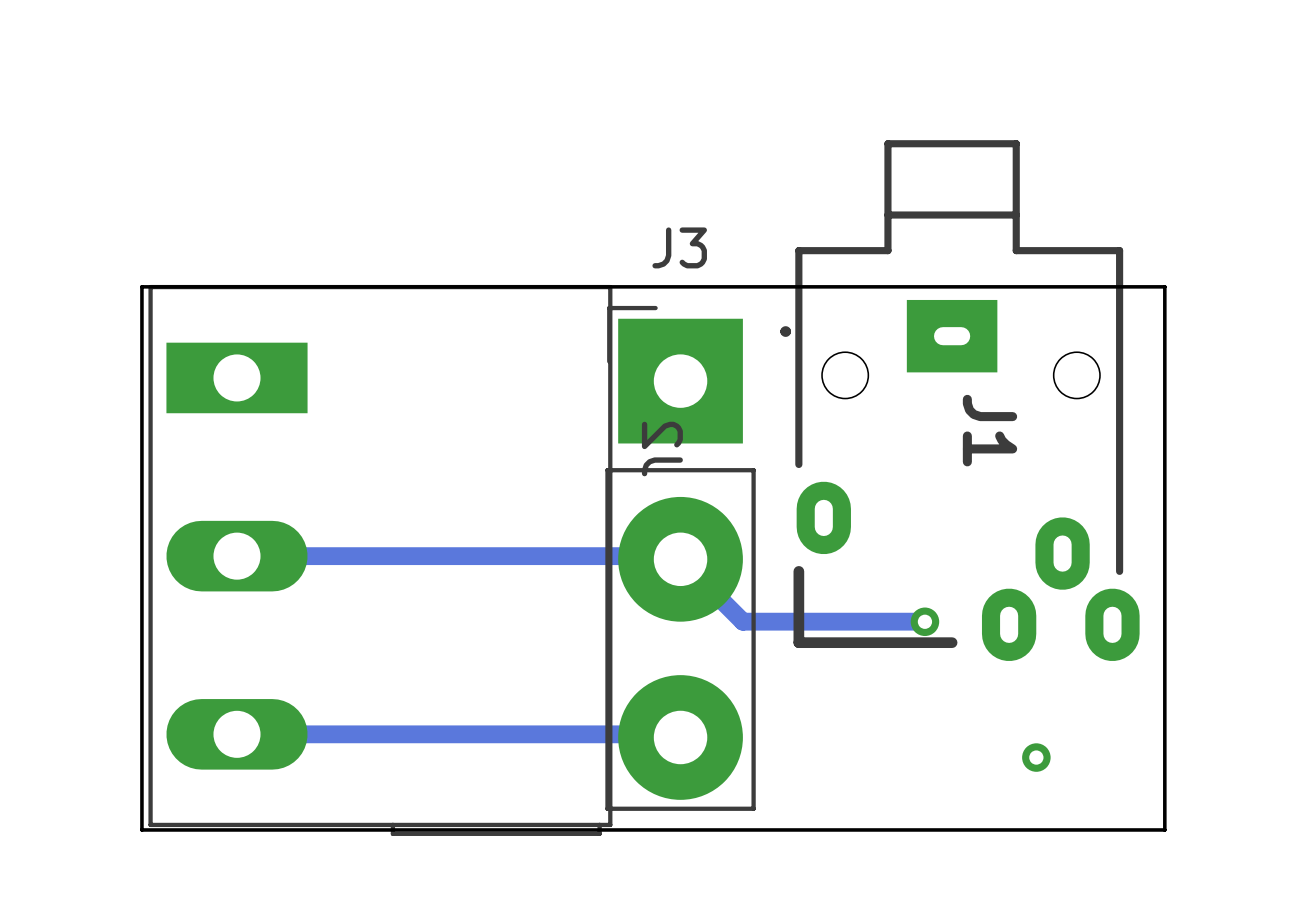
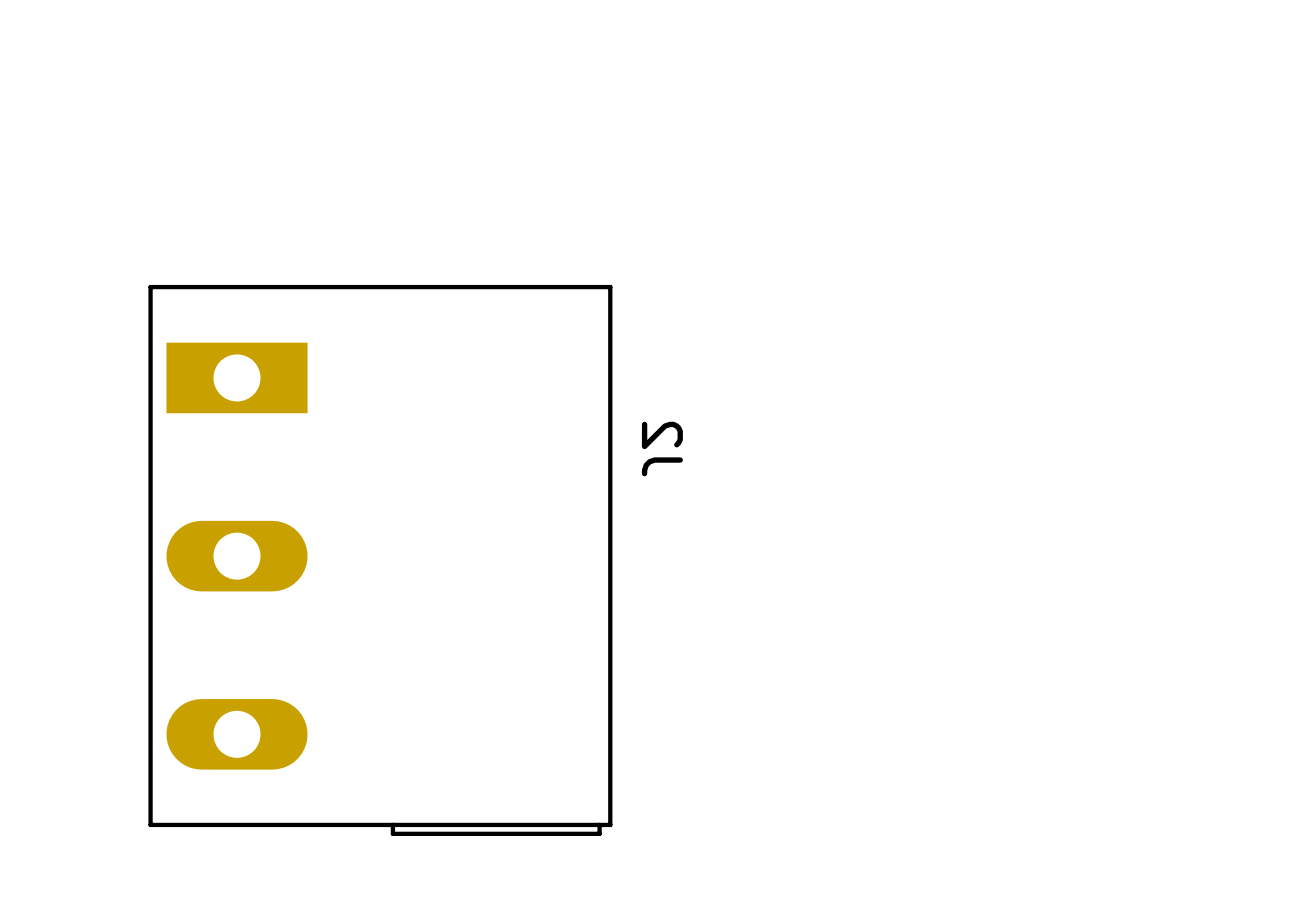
board edge: (1164, 286) (1164, 829) (141, 829) (141, 286) (1164, 286) -> none
J1: (959, 400) -> none
track: (236, 556) (677, 556) (742, 621) (924, 621) -> none
J3: (680, 558) -> none
via: (924, 621) -> none
track: (236, 734) (677, 734) (680, 737) -> none
via: (1036, 757) -> none

